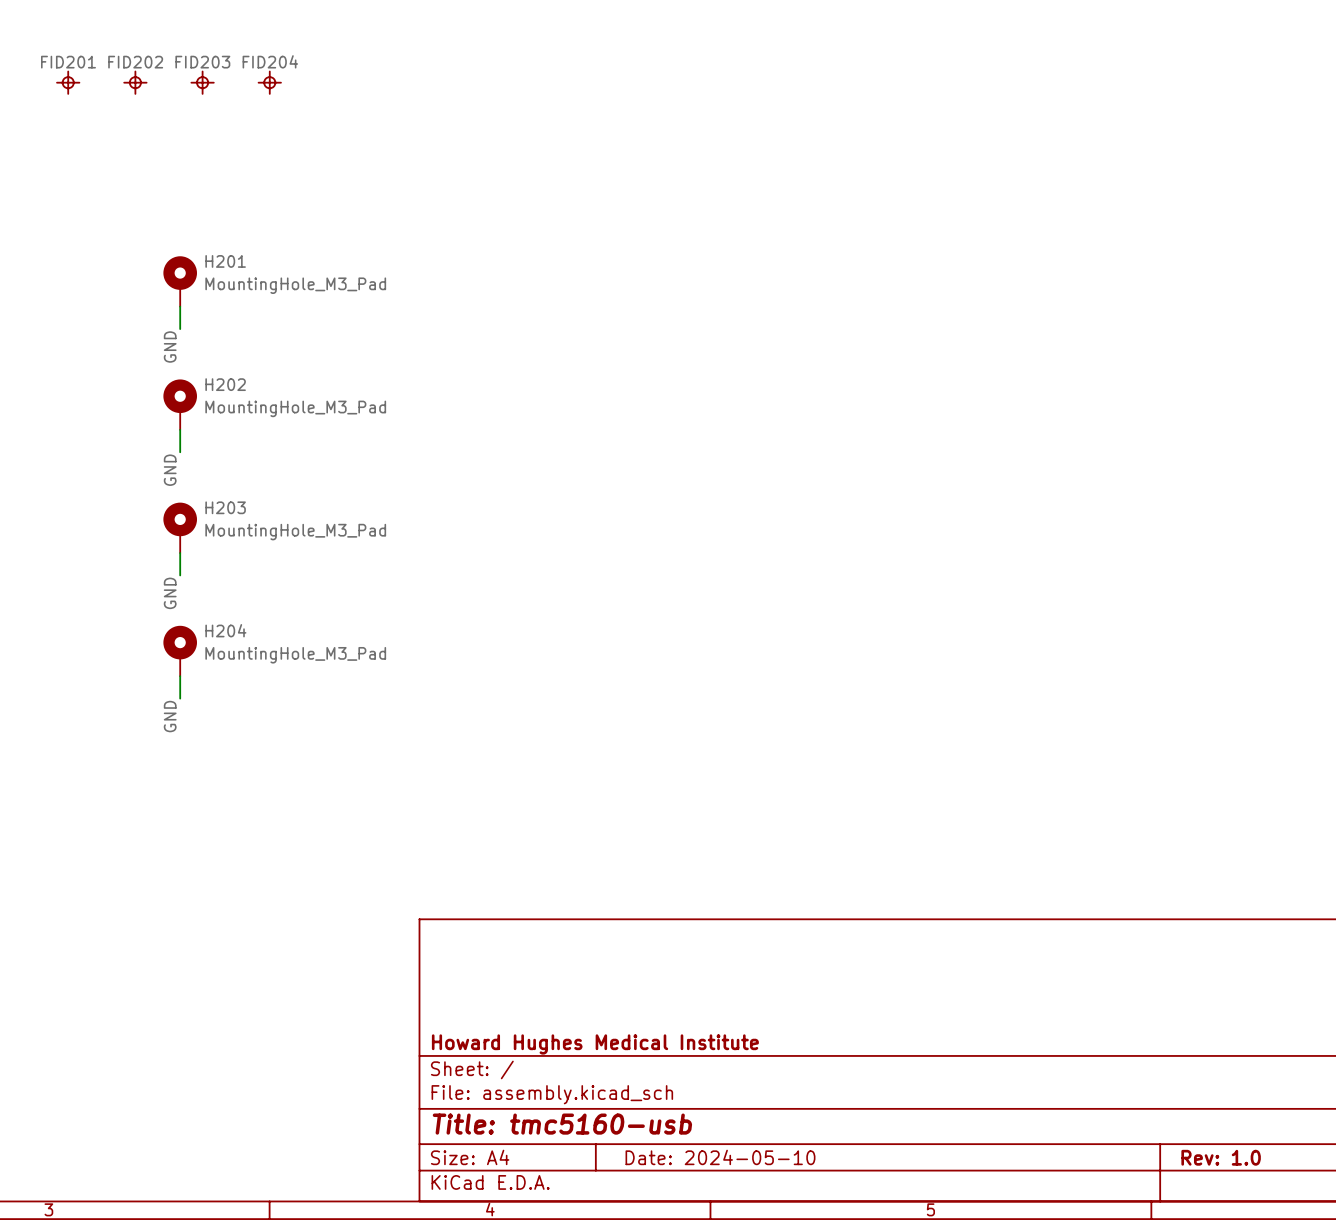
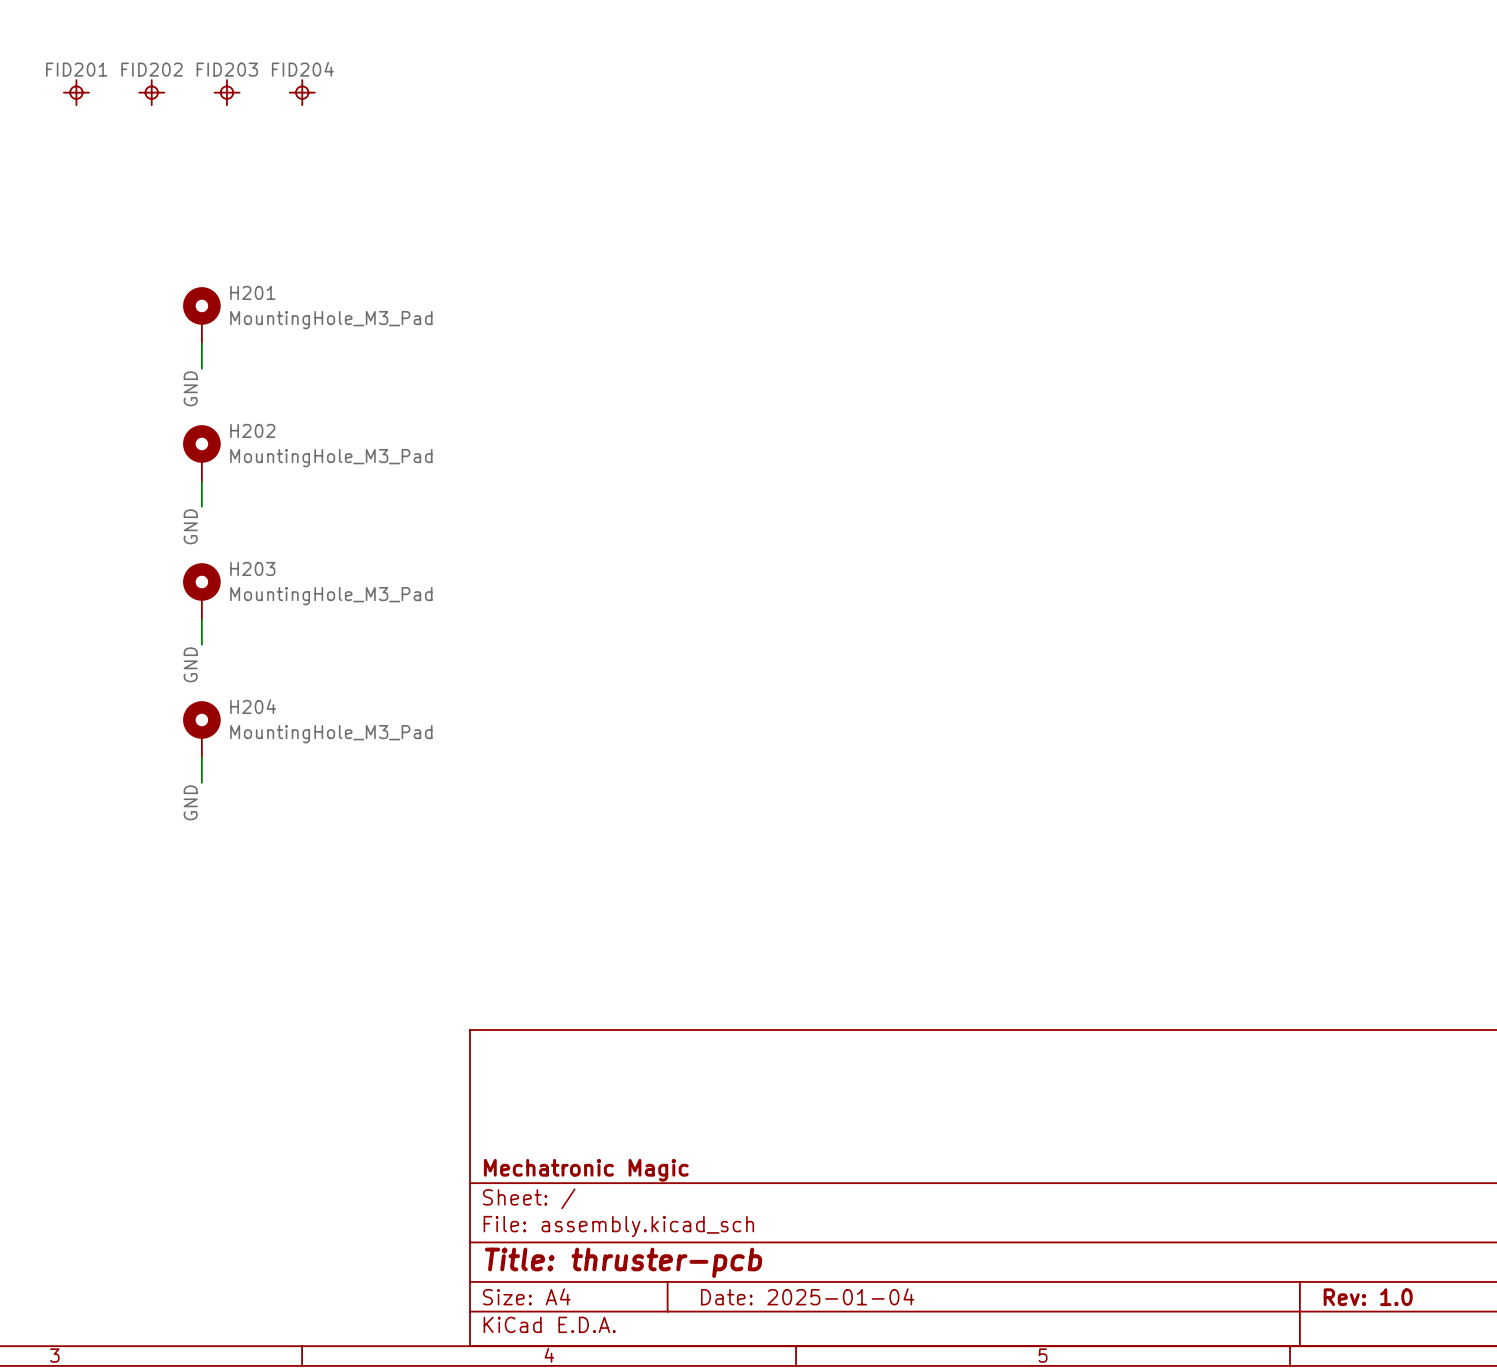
title block: Howard Hughes Medical Institute (595, 1044) -> Mechatronic Magic (586, 1170)
title block: Title: tmc5160-usb (562, 1124) -> Title: thruster-pcb (623, 1262)
title block: Date: 2024-05-10 (720, 1157) -> Date: 2025-01-04 (807, 1296)

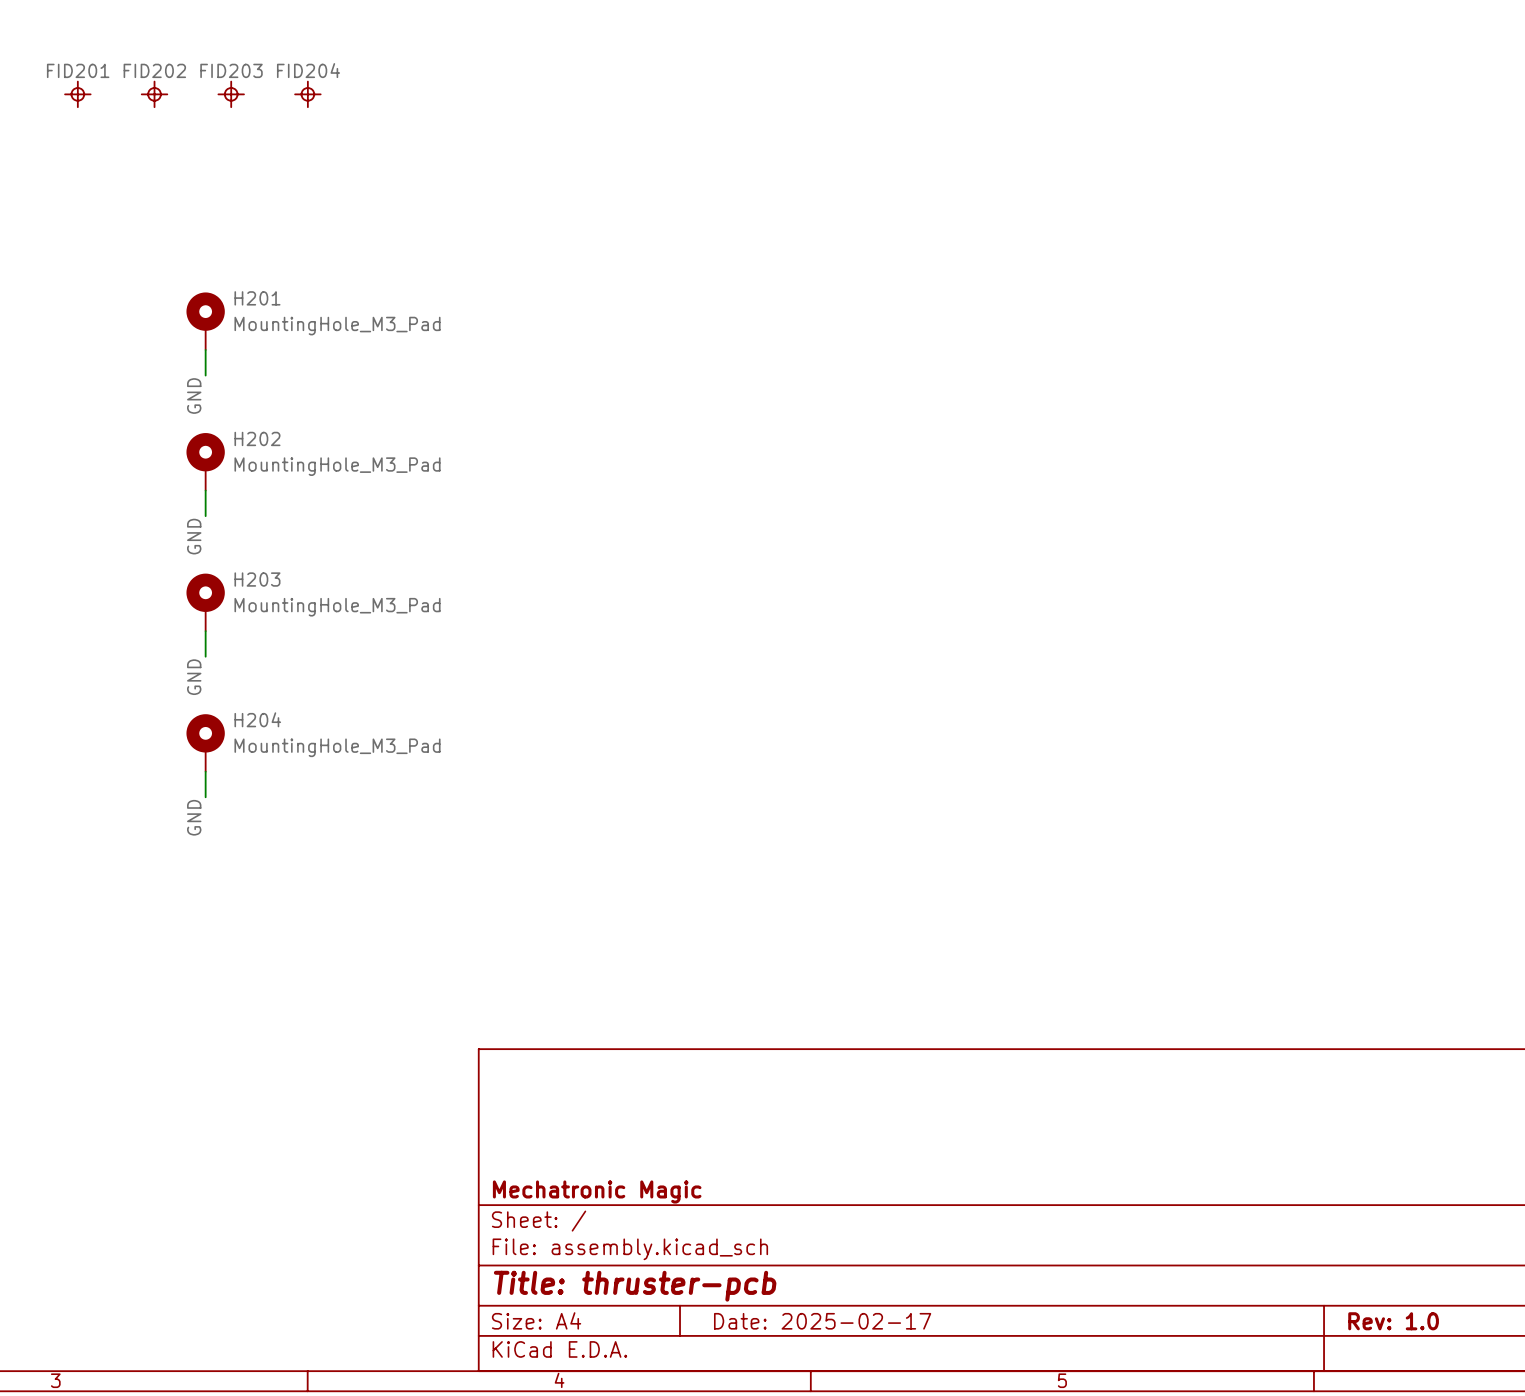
title block: Date: 2025-01-04 (807, 1296) -> Date: 2025-02-17 (822, 1321)

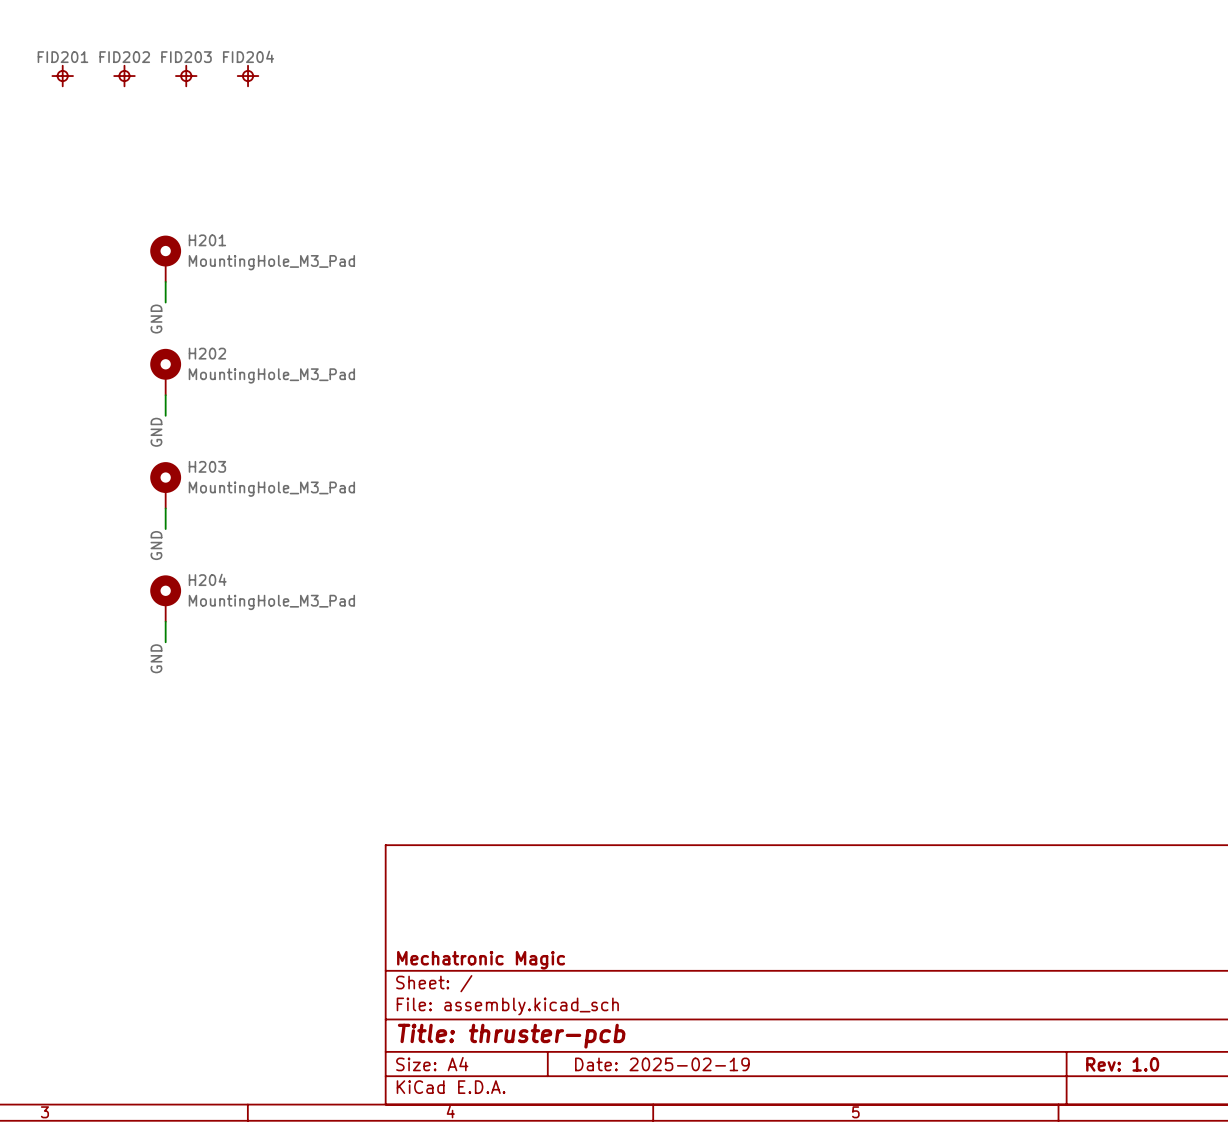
title block: Date: 2025-02-17 (822, 1321) -> Date: 2025-02-19 (662, 1064)

